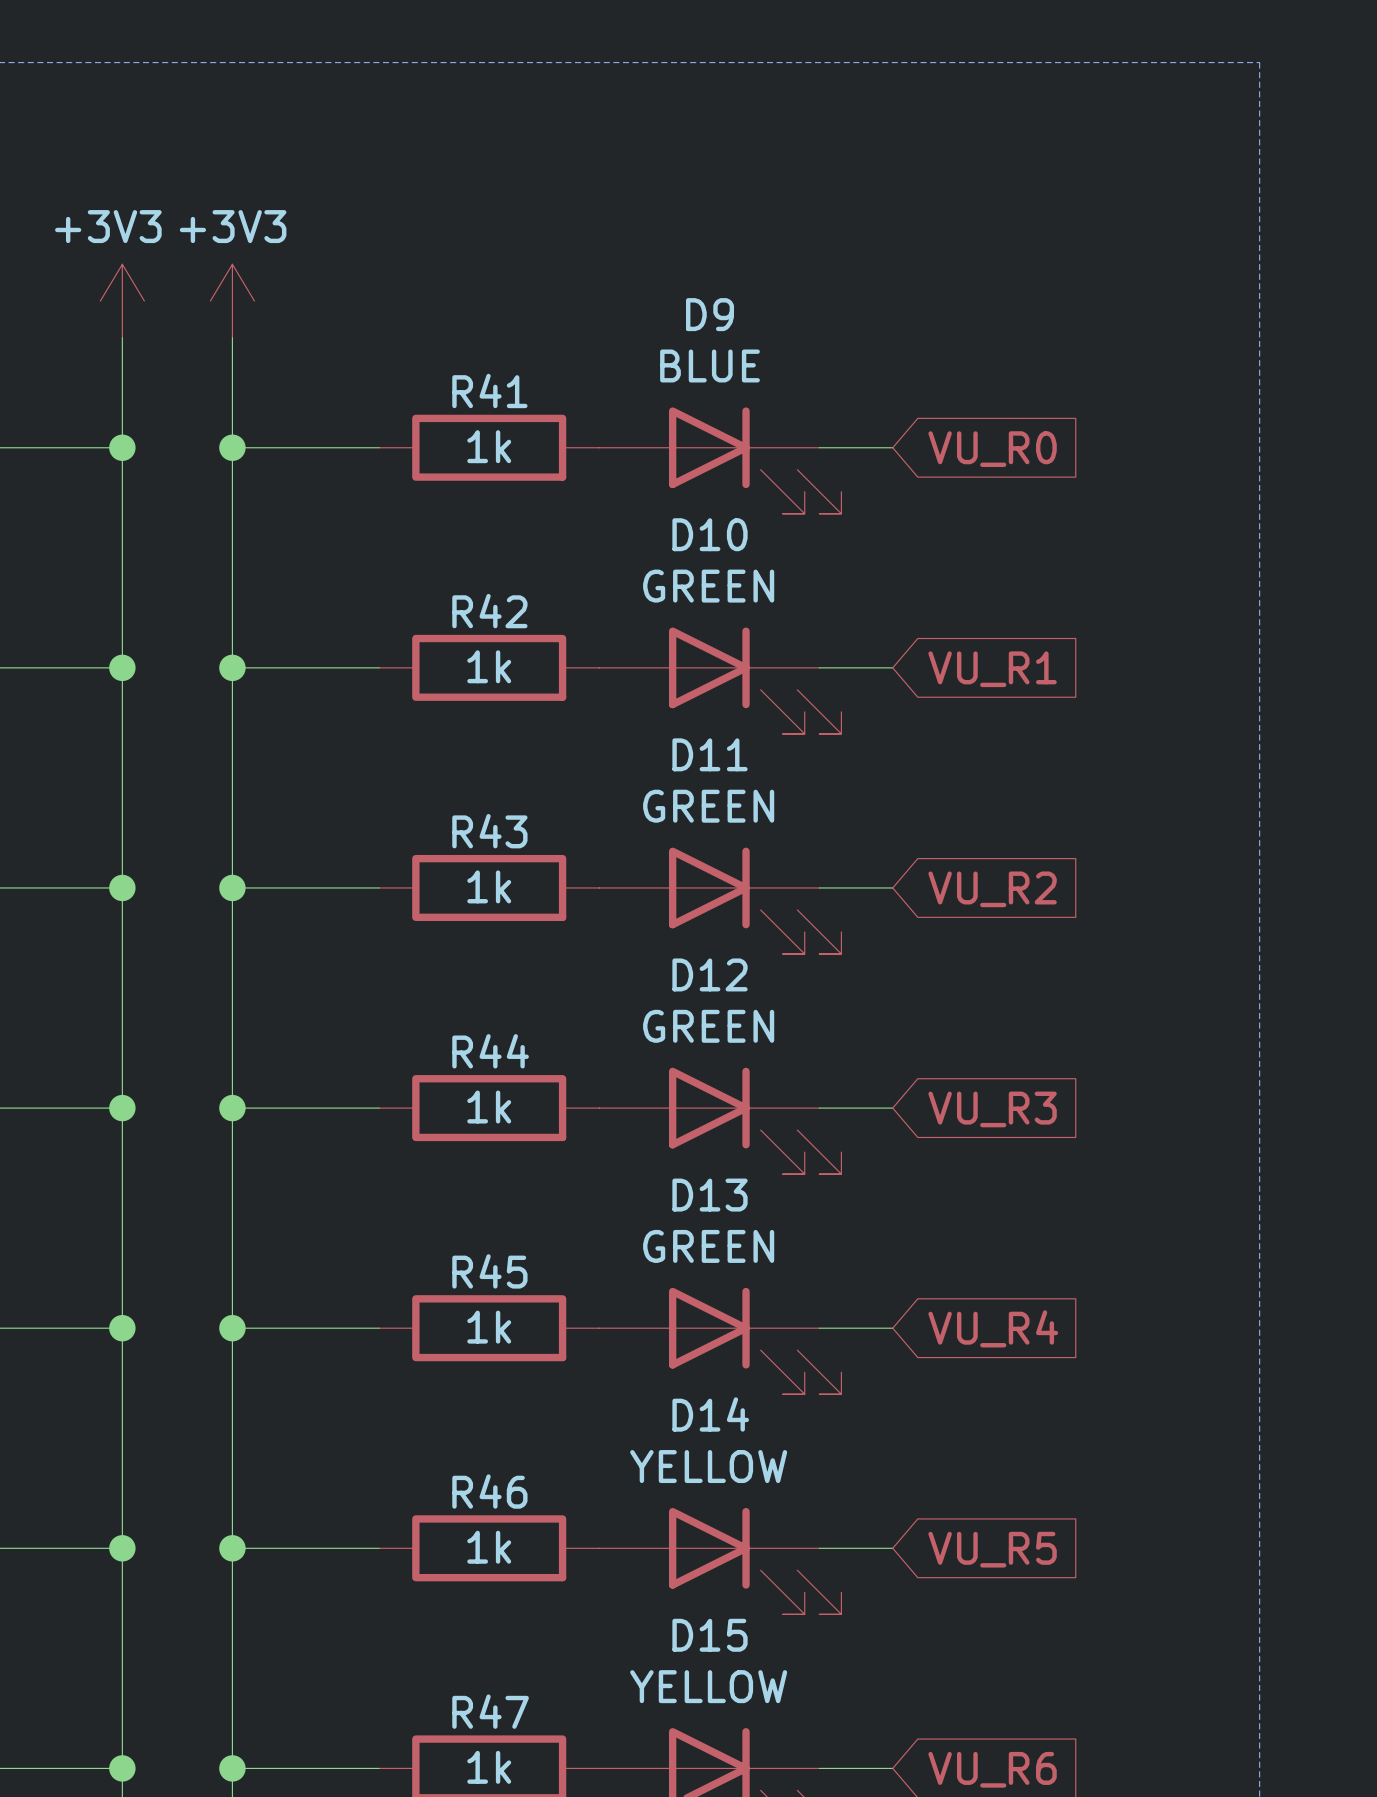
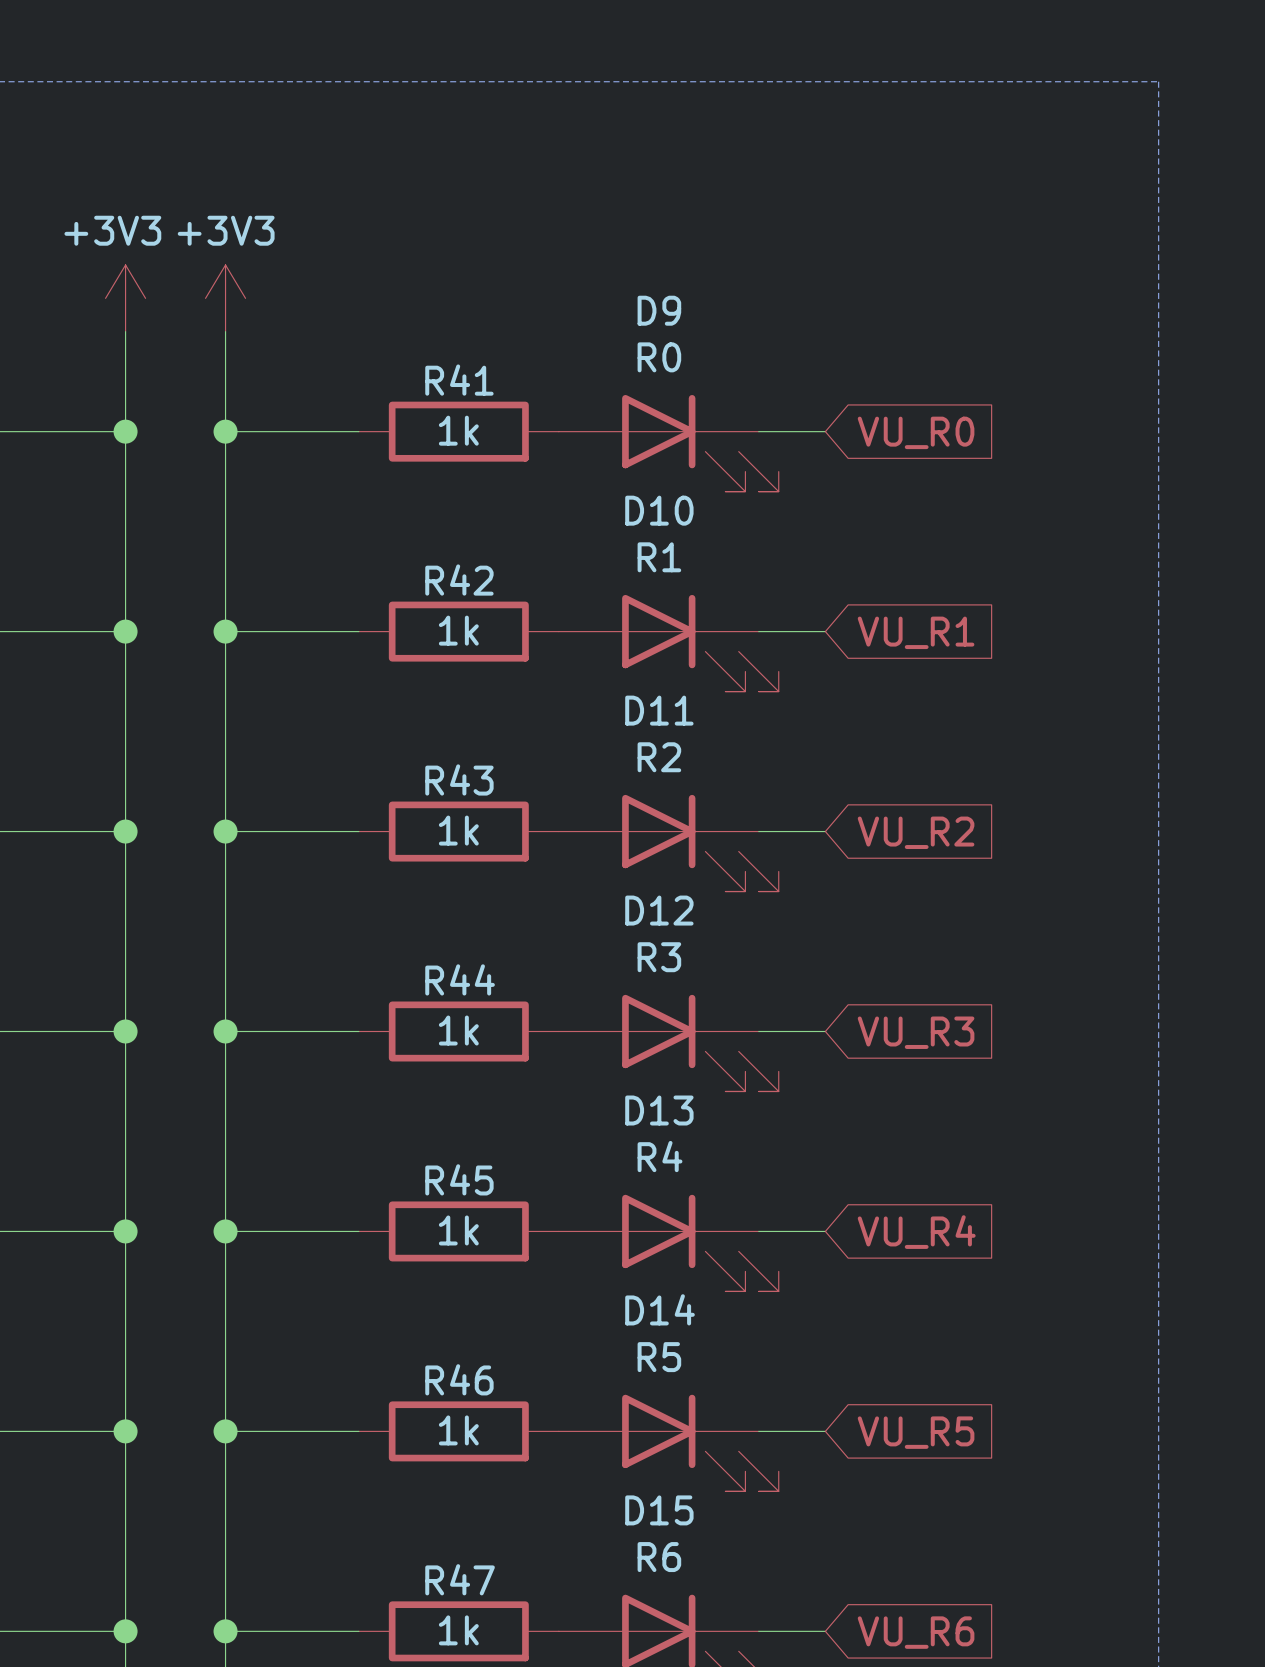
D9 value: BLUE (710, 365) -> R0 (659, 357)
D10 value: GREEN (708, 586) -> R1 (659, 557)
D11 value: GREEN (708, 806) -> R2 (659, 757)
D12 value: GREEN (708, 1026) -> R3 (659, 957)
D13 value: GREEN (708, 1246) -> R4 (660, 1156)
D14 value: YELLOW (708, 1466) -> R5 (659, 1357)
D15 value: YELLOW (708, 1686) -> R6 (659, 1557)

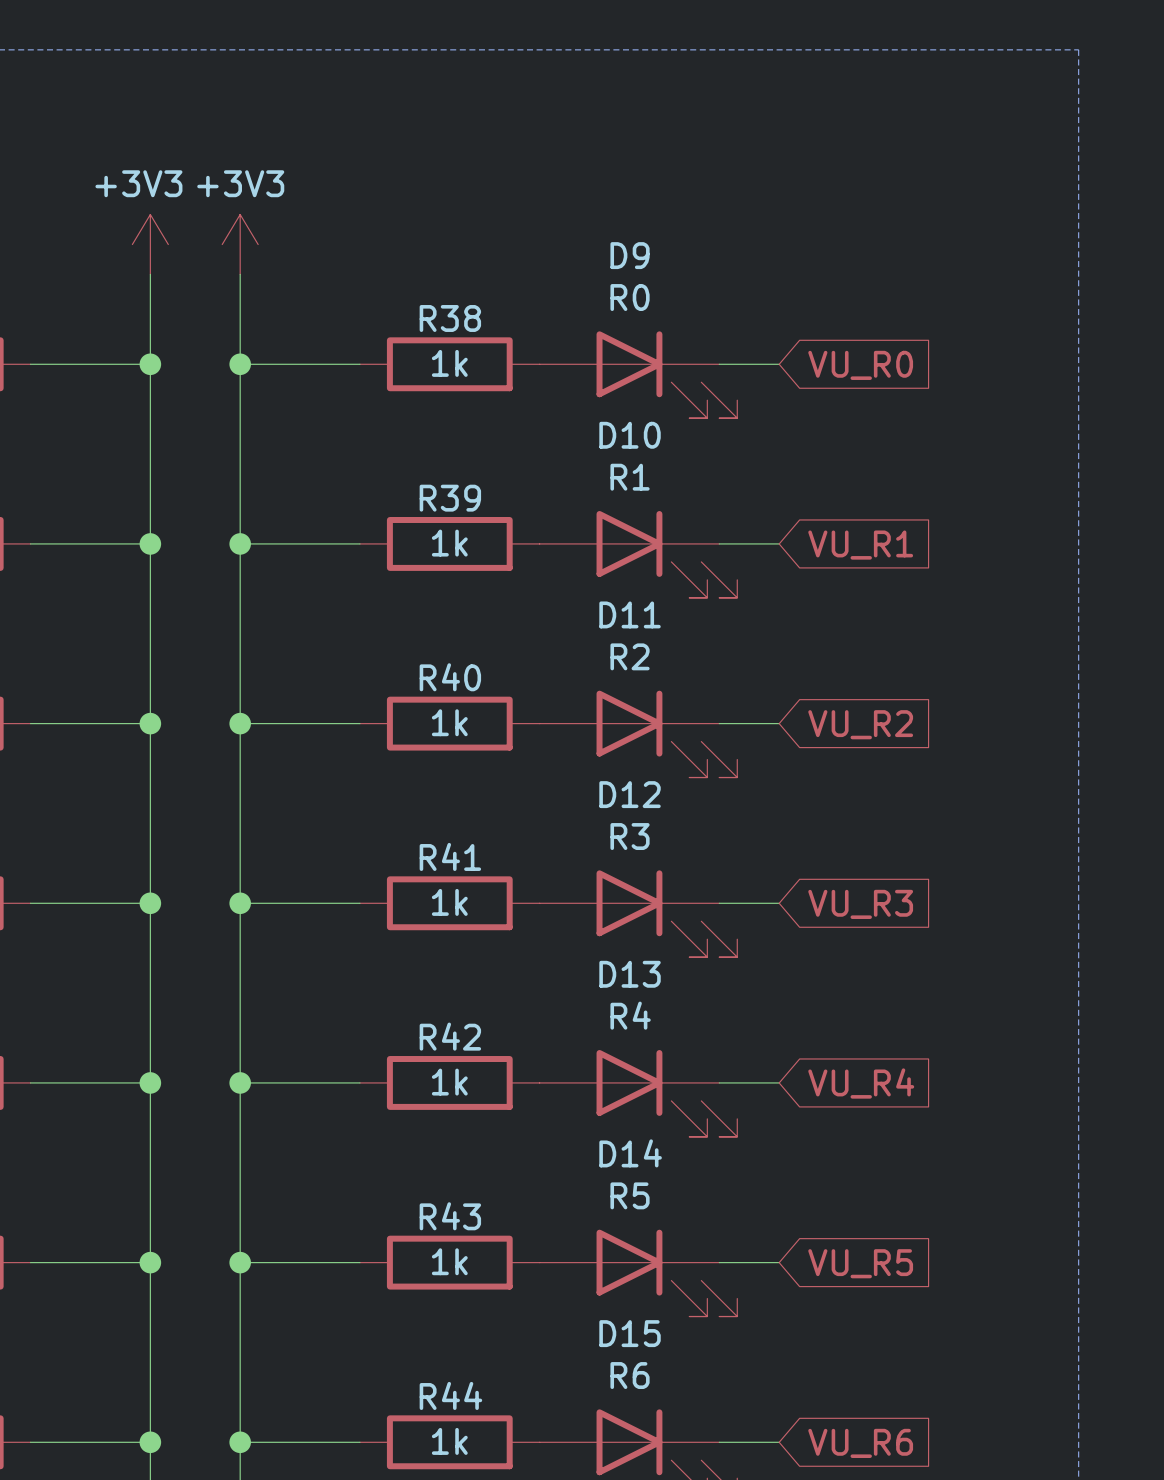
R41 name: R41 (459, 380) -> R38 (450, 318)
R42 name: R42 (459, 580) -> R39 (450, 498)
R43 name: R43 (459, 779) -> R40 (450, 677)
R44 name: R44 (460, 979) -> R41 (450, 856)
R45 name: R45 (459, 1179) -> R42 (450, 1036)
R46 name: R46 (459, 1379) -> R43 (450, 1216)
R47 name: R47 (460, 1579) -> R44 (450, 1395)

